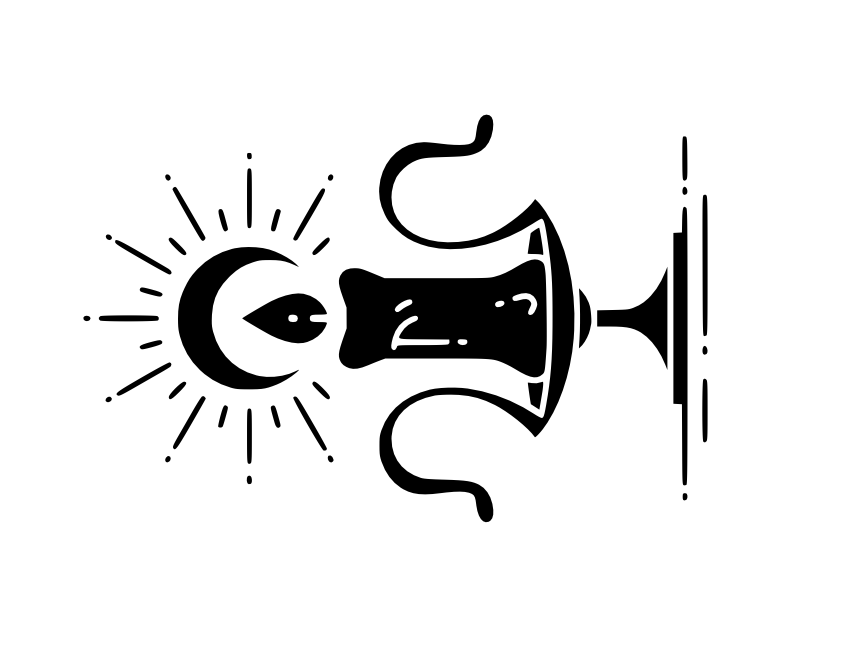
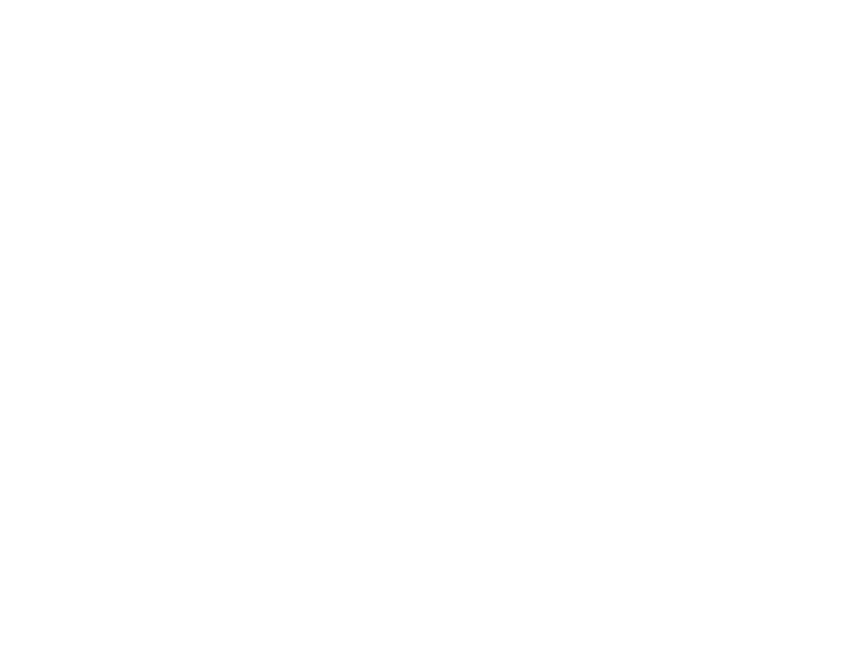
drawing: [83, 114, 708, 523] -> none

